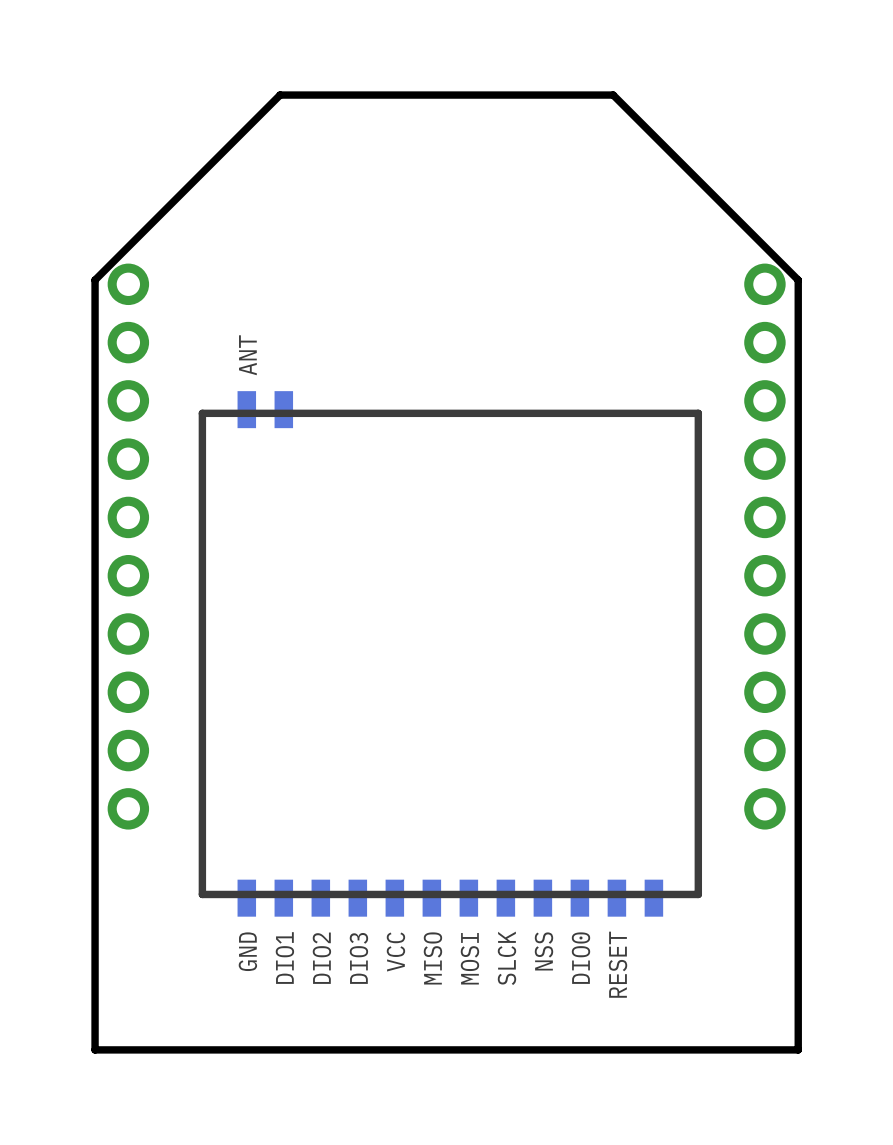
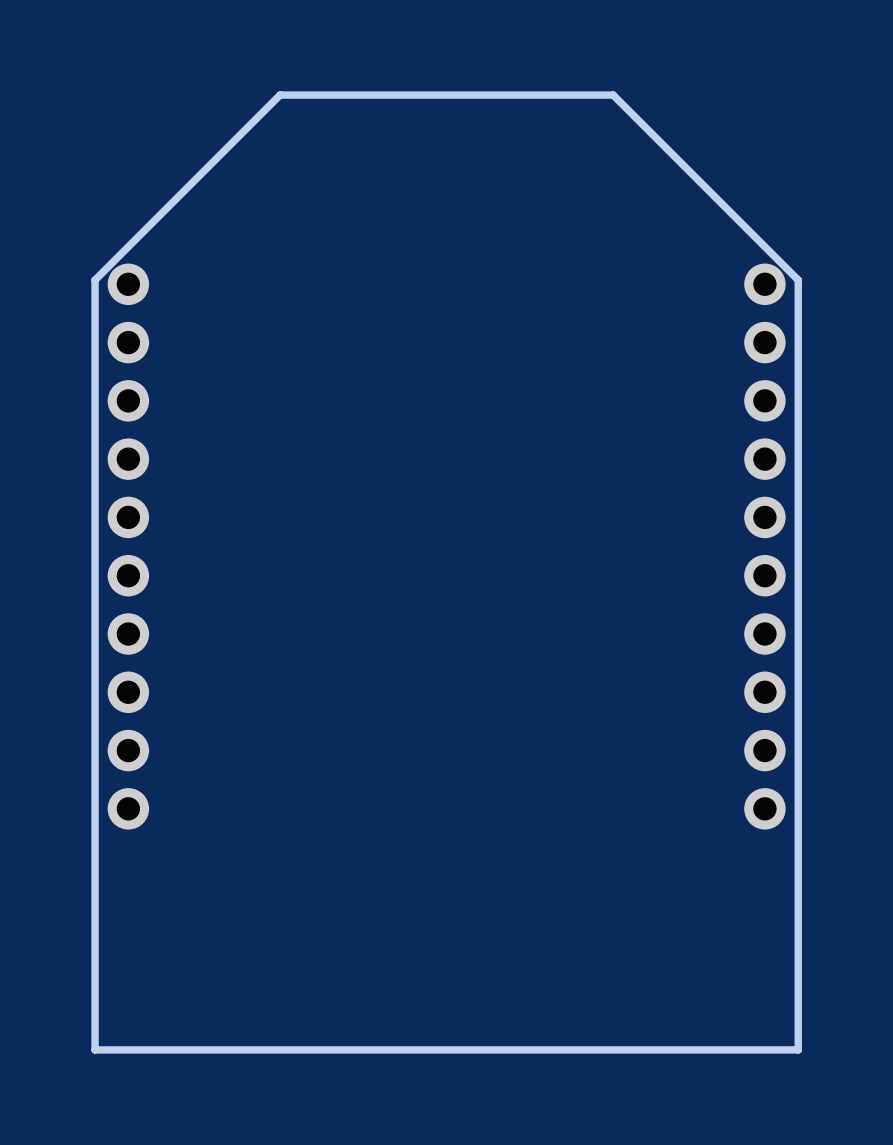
ANT: (246, 409) -> none
part: (283, 409) -> none
line: (698, 413) (202, 413) (202, 894) (698, 894) (698, 413) -> none
GND: (246, 898) -> none
DIO1: (283, 898) -> none
DIO2: (320, 898) -> none
DIO3: (357, 898) -> none
VCC: (394, 898) -> none
MISO: (431, 898) -> none
MOSI: (468, 898) -> none
SLCK: (505, 898) -> none
NSS: (542, 898) -> none
DIO0: (579, 898) -> none
RESET: (616, 898) -> none
part: (653, 898) -> none

